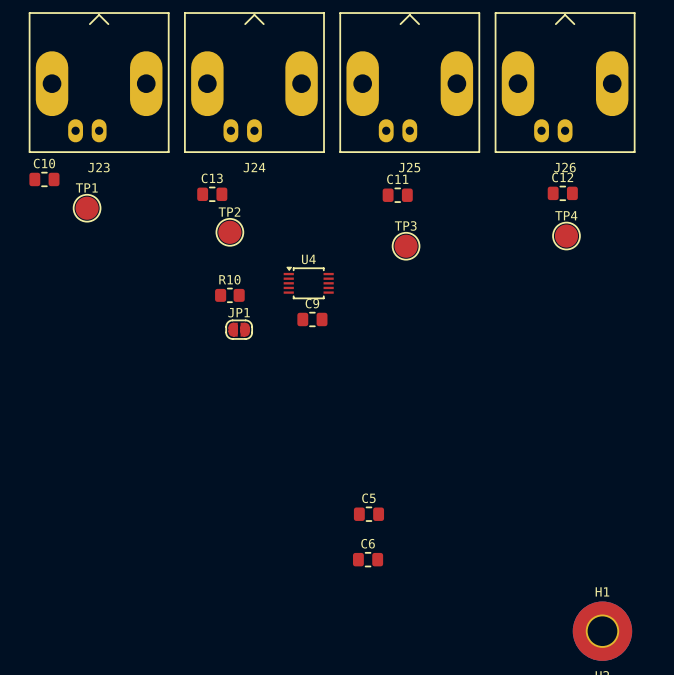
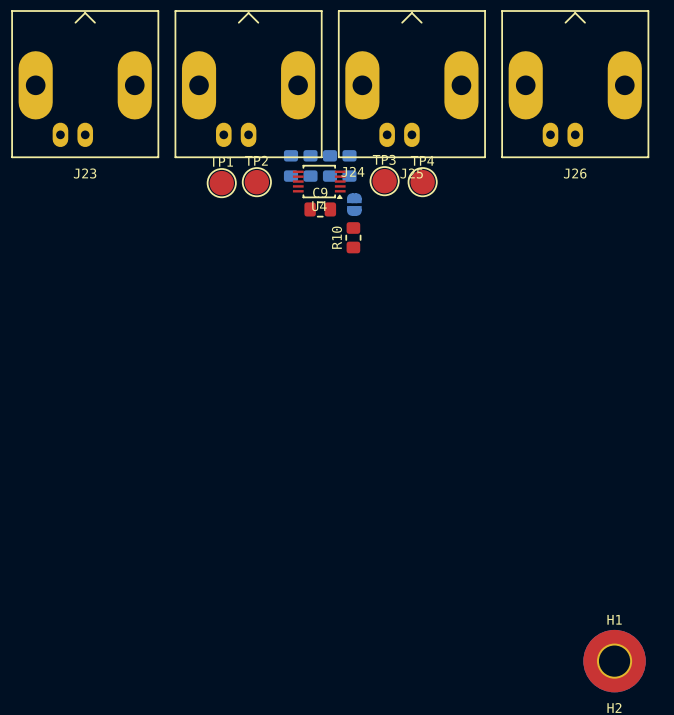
part: none -> (290, 165)
J24 name position: J24 (254, 167) -> J24 (352, 171)
C10: (44, 179) -> none
C12 side: top (562, 193) -> bottom (349, 165)
C13 side: top (212, 194) -> bottom (310, 165)
C11 side: top (397, 195) -> bottom (329, 165)
TP1 position: (87, 208) -> (221, 183)
TP2 position: (229, 232) -> (256, 182)
TP4 position: (566, 236) -> (422, 182)
TP3 position: (406, 246) -> (384, 181)
R10 name position: R10 (229, 279) -> R10 (336, 237)
U4 rotation: 0° (308, 282) -> 180° (319, 181)
U4 position: (308, 282) -> (319, 181)
R10 rotation: 0° (229, 295) -> 90° clockwise (353, 237)
R10 position: (229, 295) -> (353, 237)
C9 position: (312, 319) -> (320, 209)
JP1 side: top (239, 329) -> bottom (354, 204)
C5: (368, 514) -> none
C6: (368, 559) -> none

